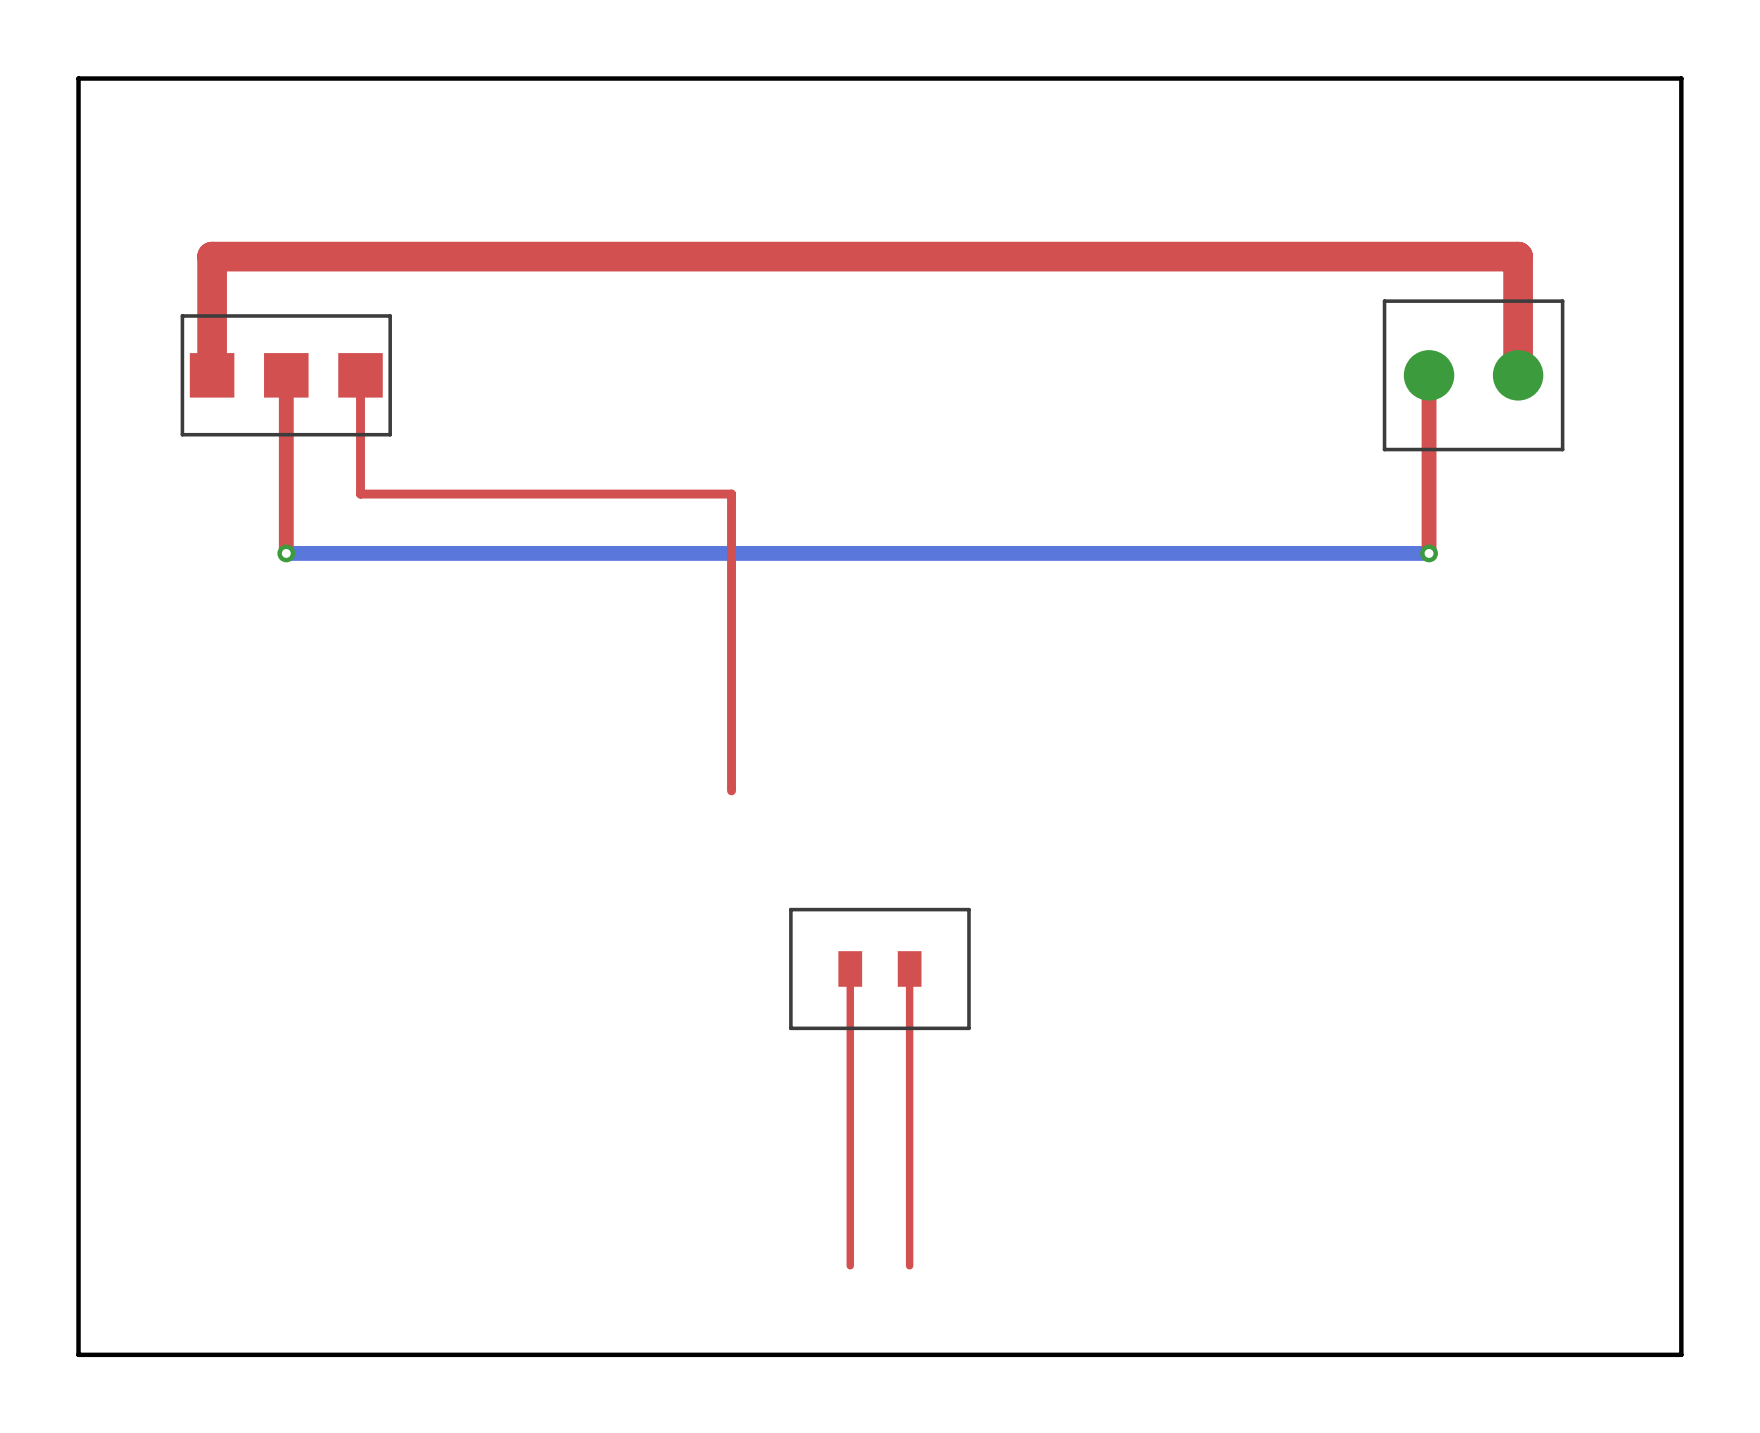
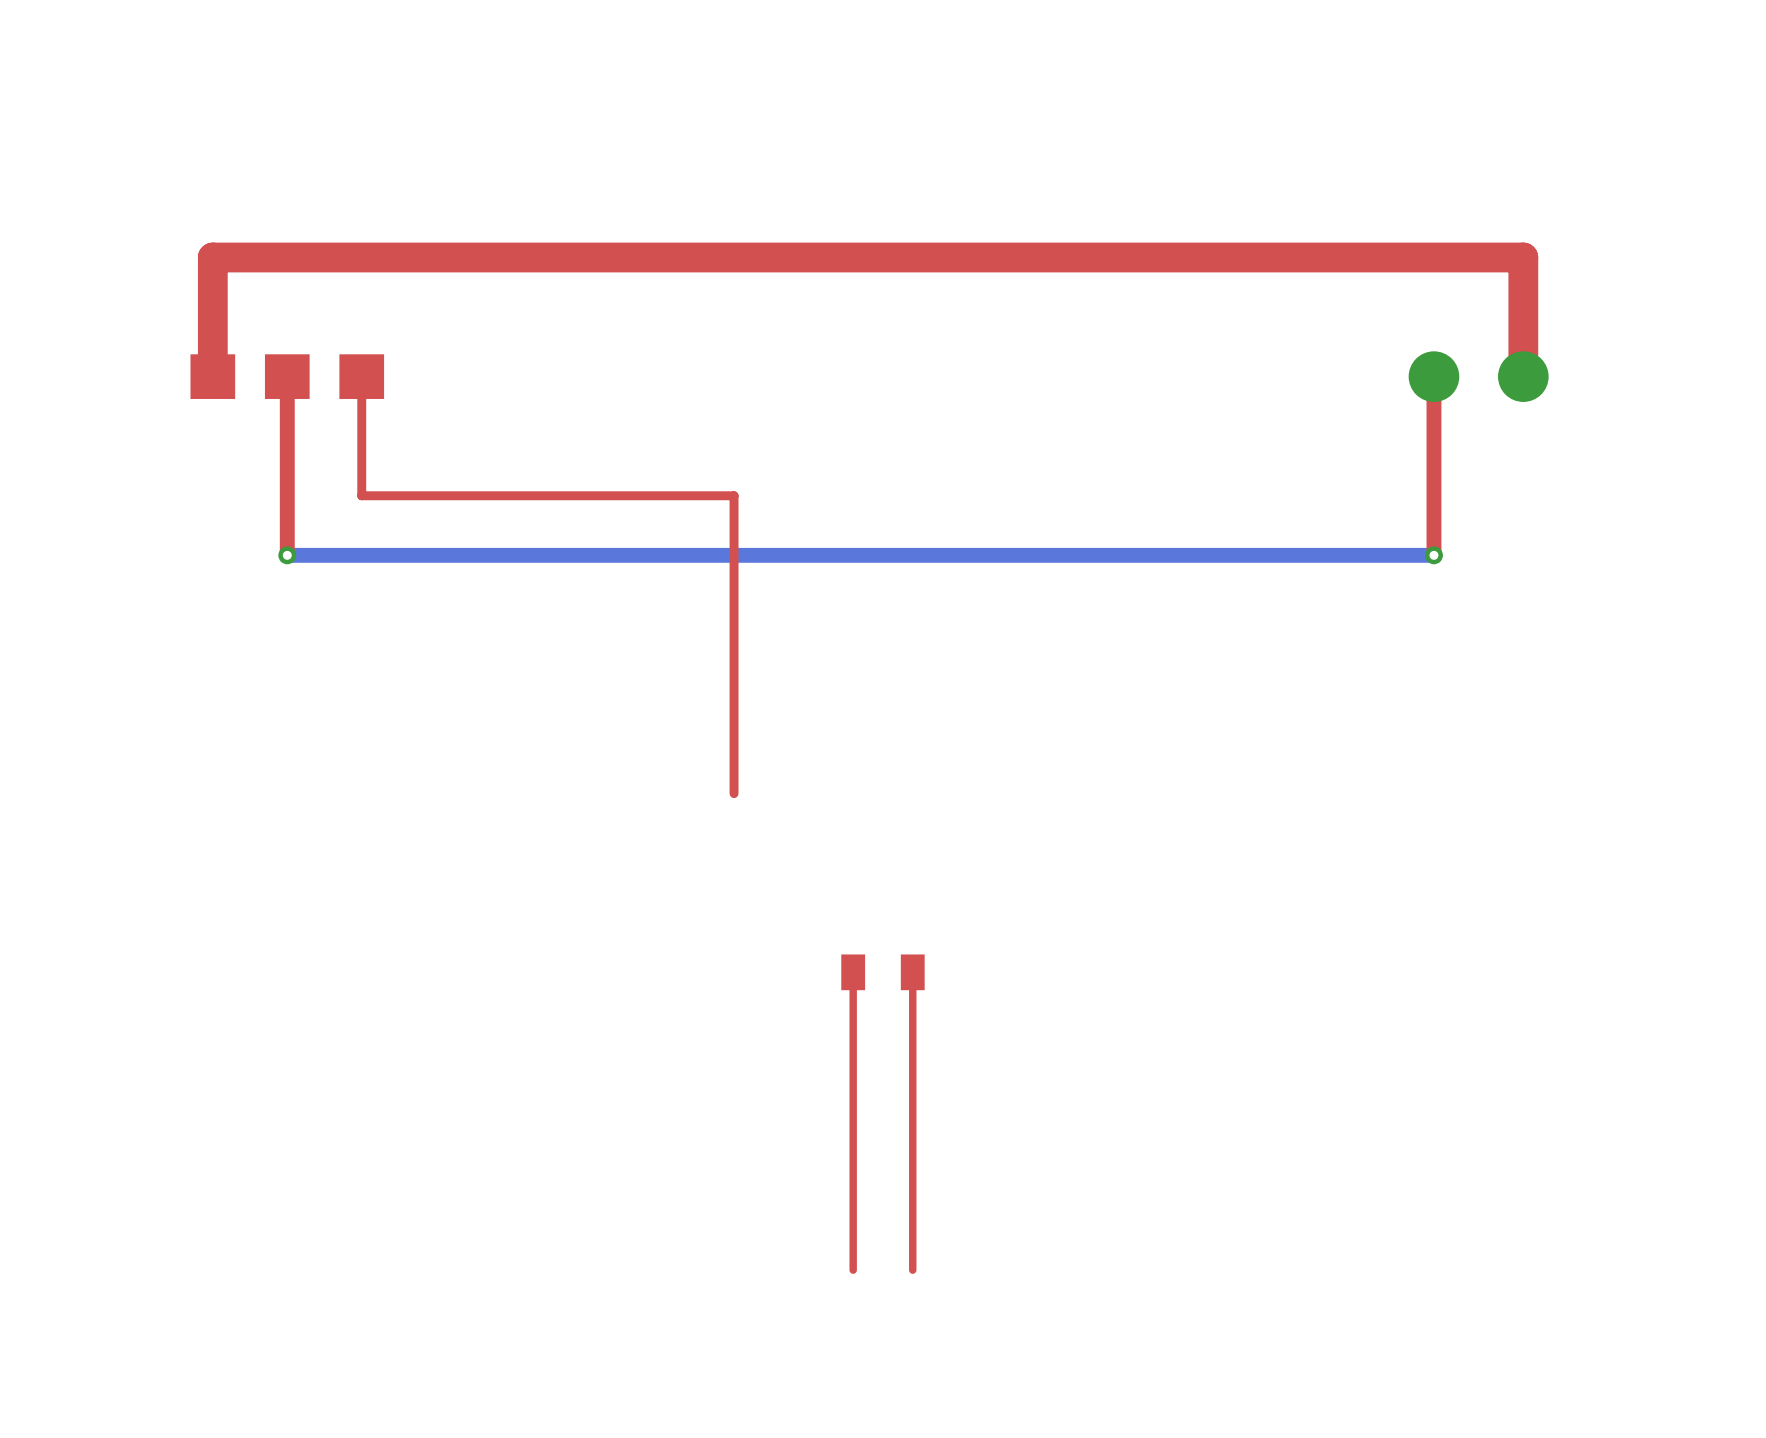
board edge: (78, 78) (1681, 78) (1681, 1354) (78, 1354) (78, 78) -> none
part footprint: [1382, 299, 1565, 452] -> [1408, 351, 1549, 402]
part footprint: [180, 314, 392, 437] -> [190, 354, 385, 399]
part footprint: [789, 907, 971, 1031] -> [841, 954, 925, 991]

